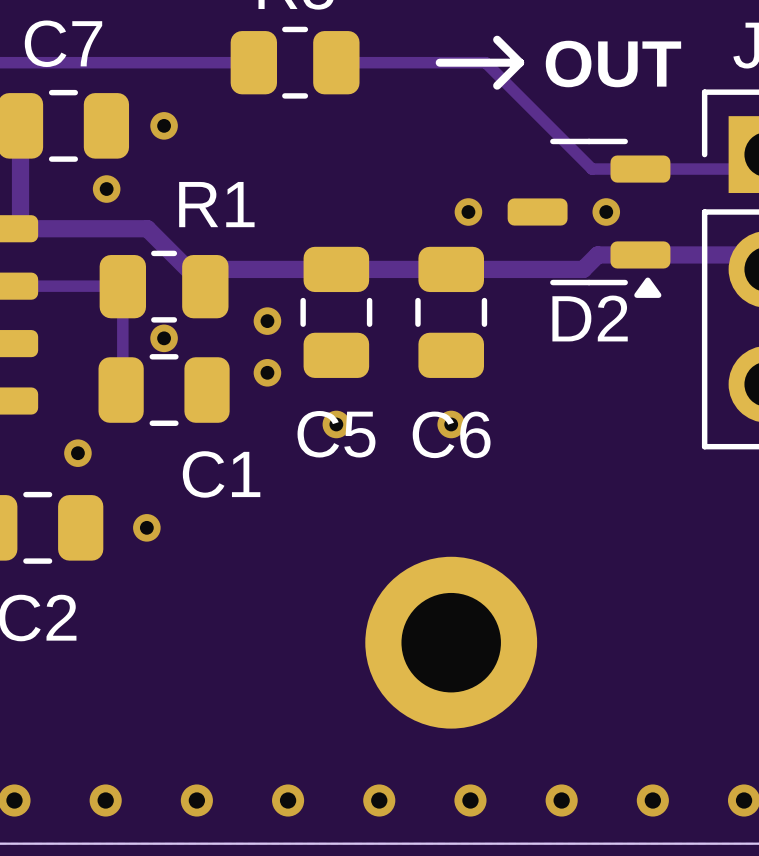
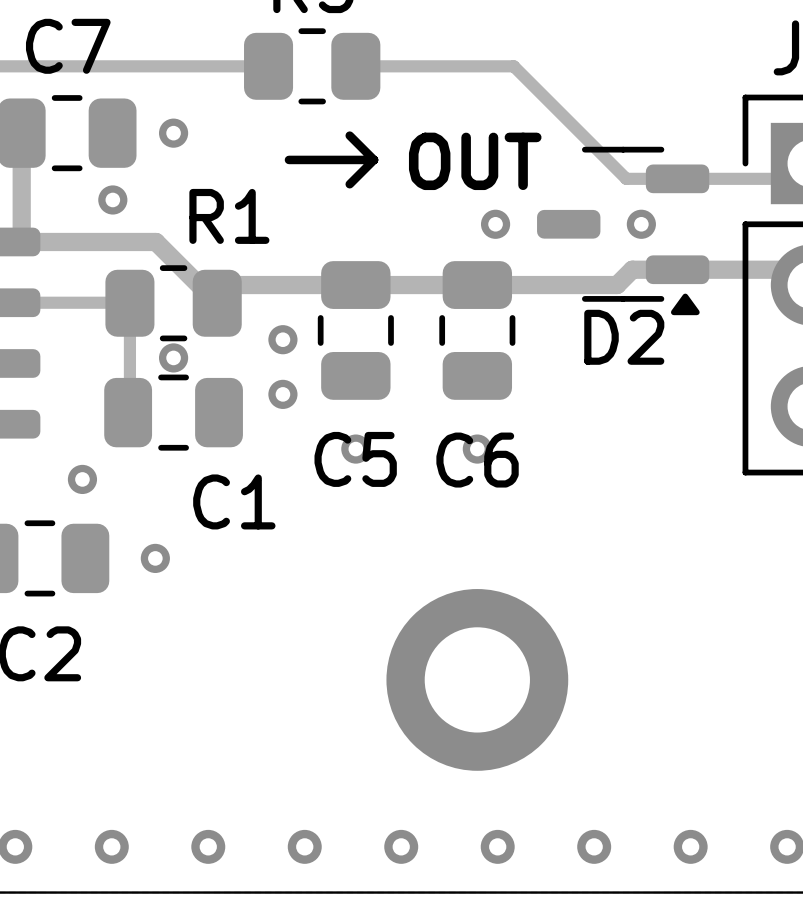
line: (497, 39) (520, 62) -> (349, 135) (374, 159)
line: (439, 62) (520, 62) -> (288, 159) (374, 159)
line: (520, 62) (497, 85) -> (374, 159) (349, 184)
text position: OUT (613, 64) -> OUT (475, 161)

